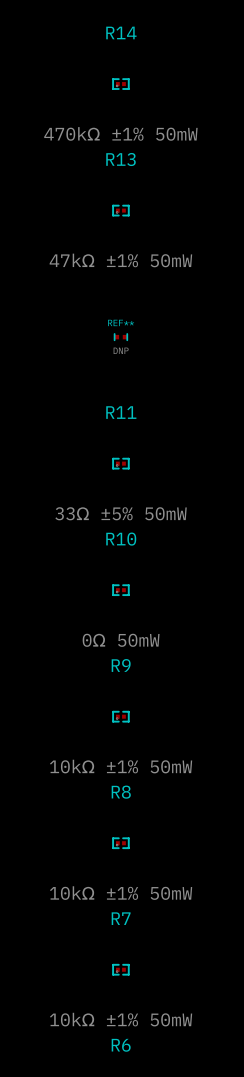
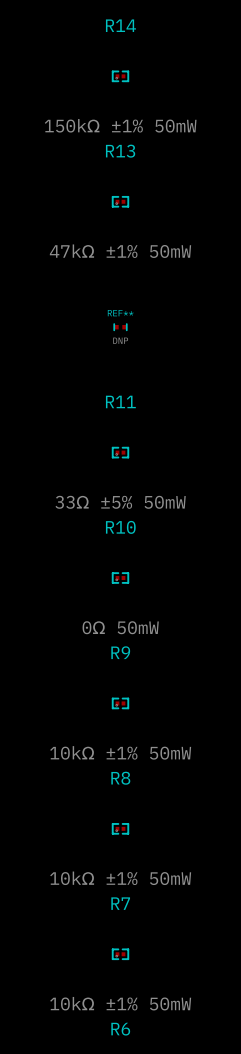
R14 value: 470kΩ ±1% 50mW (120, 133) -> 150kΩ ±1% 50mW (120, 125)

